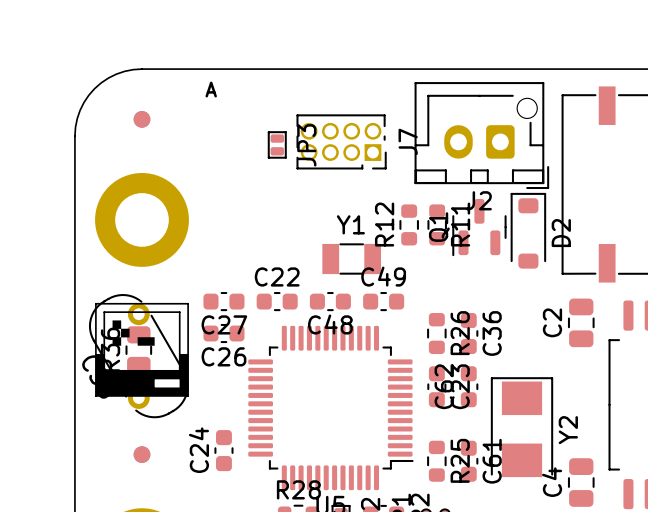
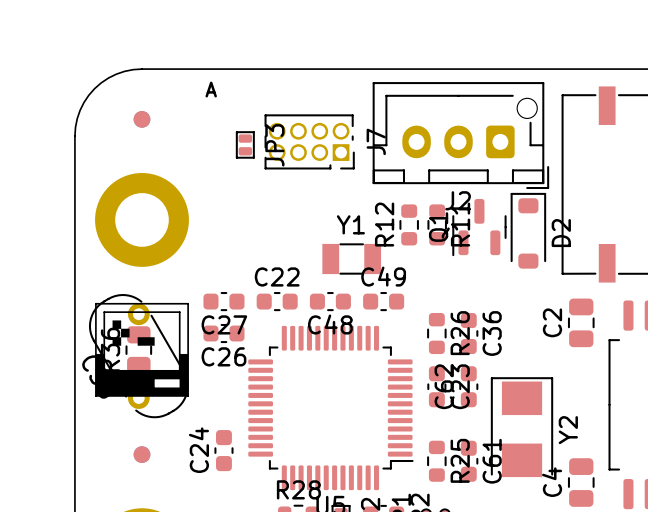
J2 footprint: [414, 82, 550, 190] -> [372, 82, 550, 190]
J7 position: (341, 141) -> (309, 141)
JP3 position: (277, 144) -> (245, 144)

